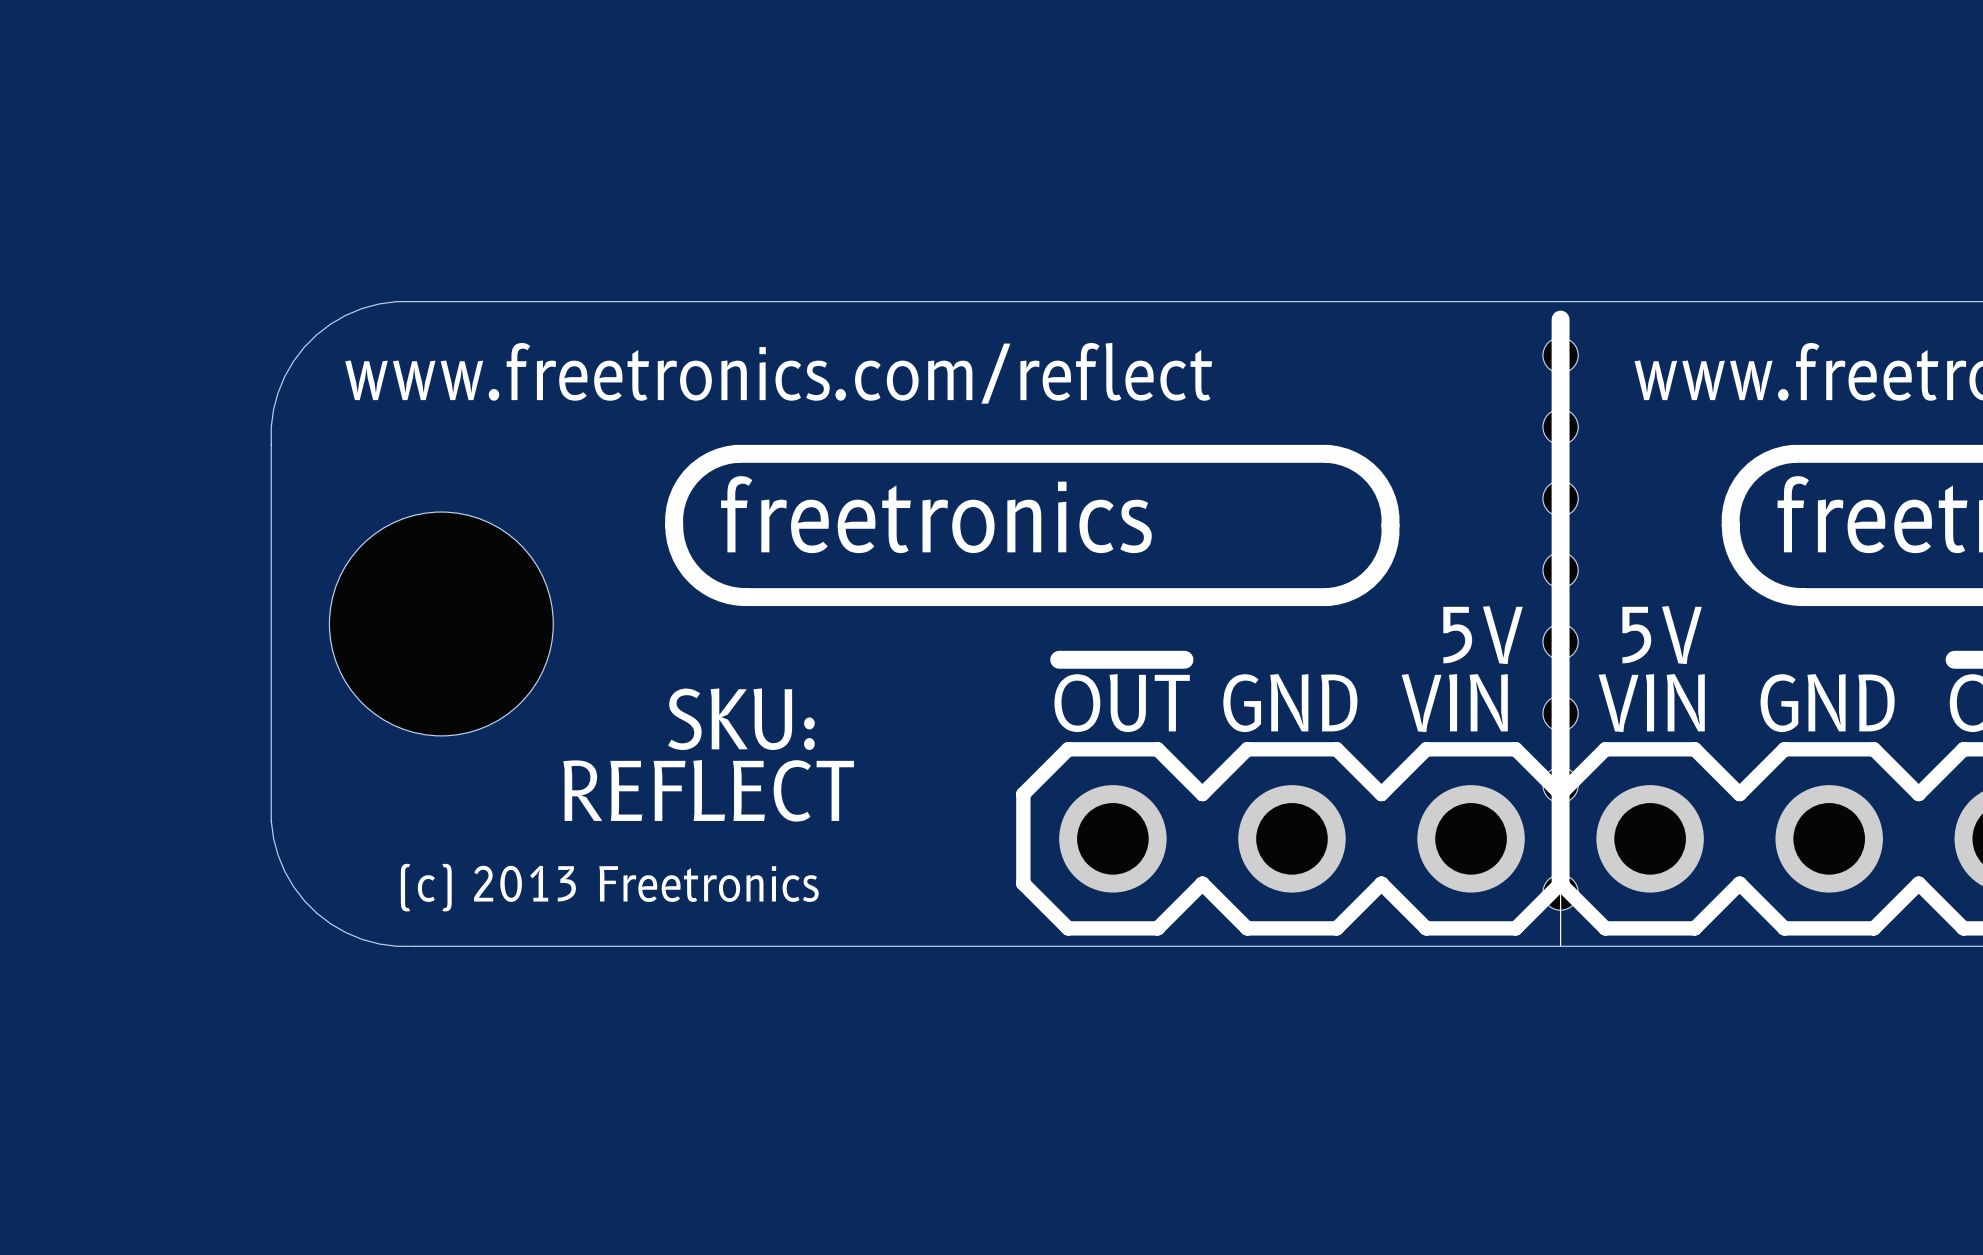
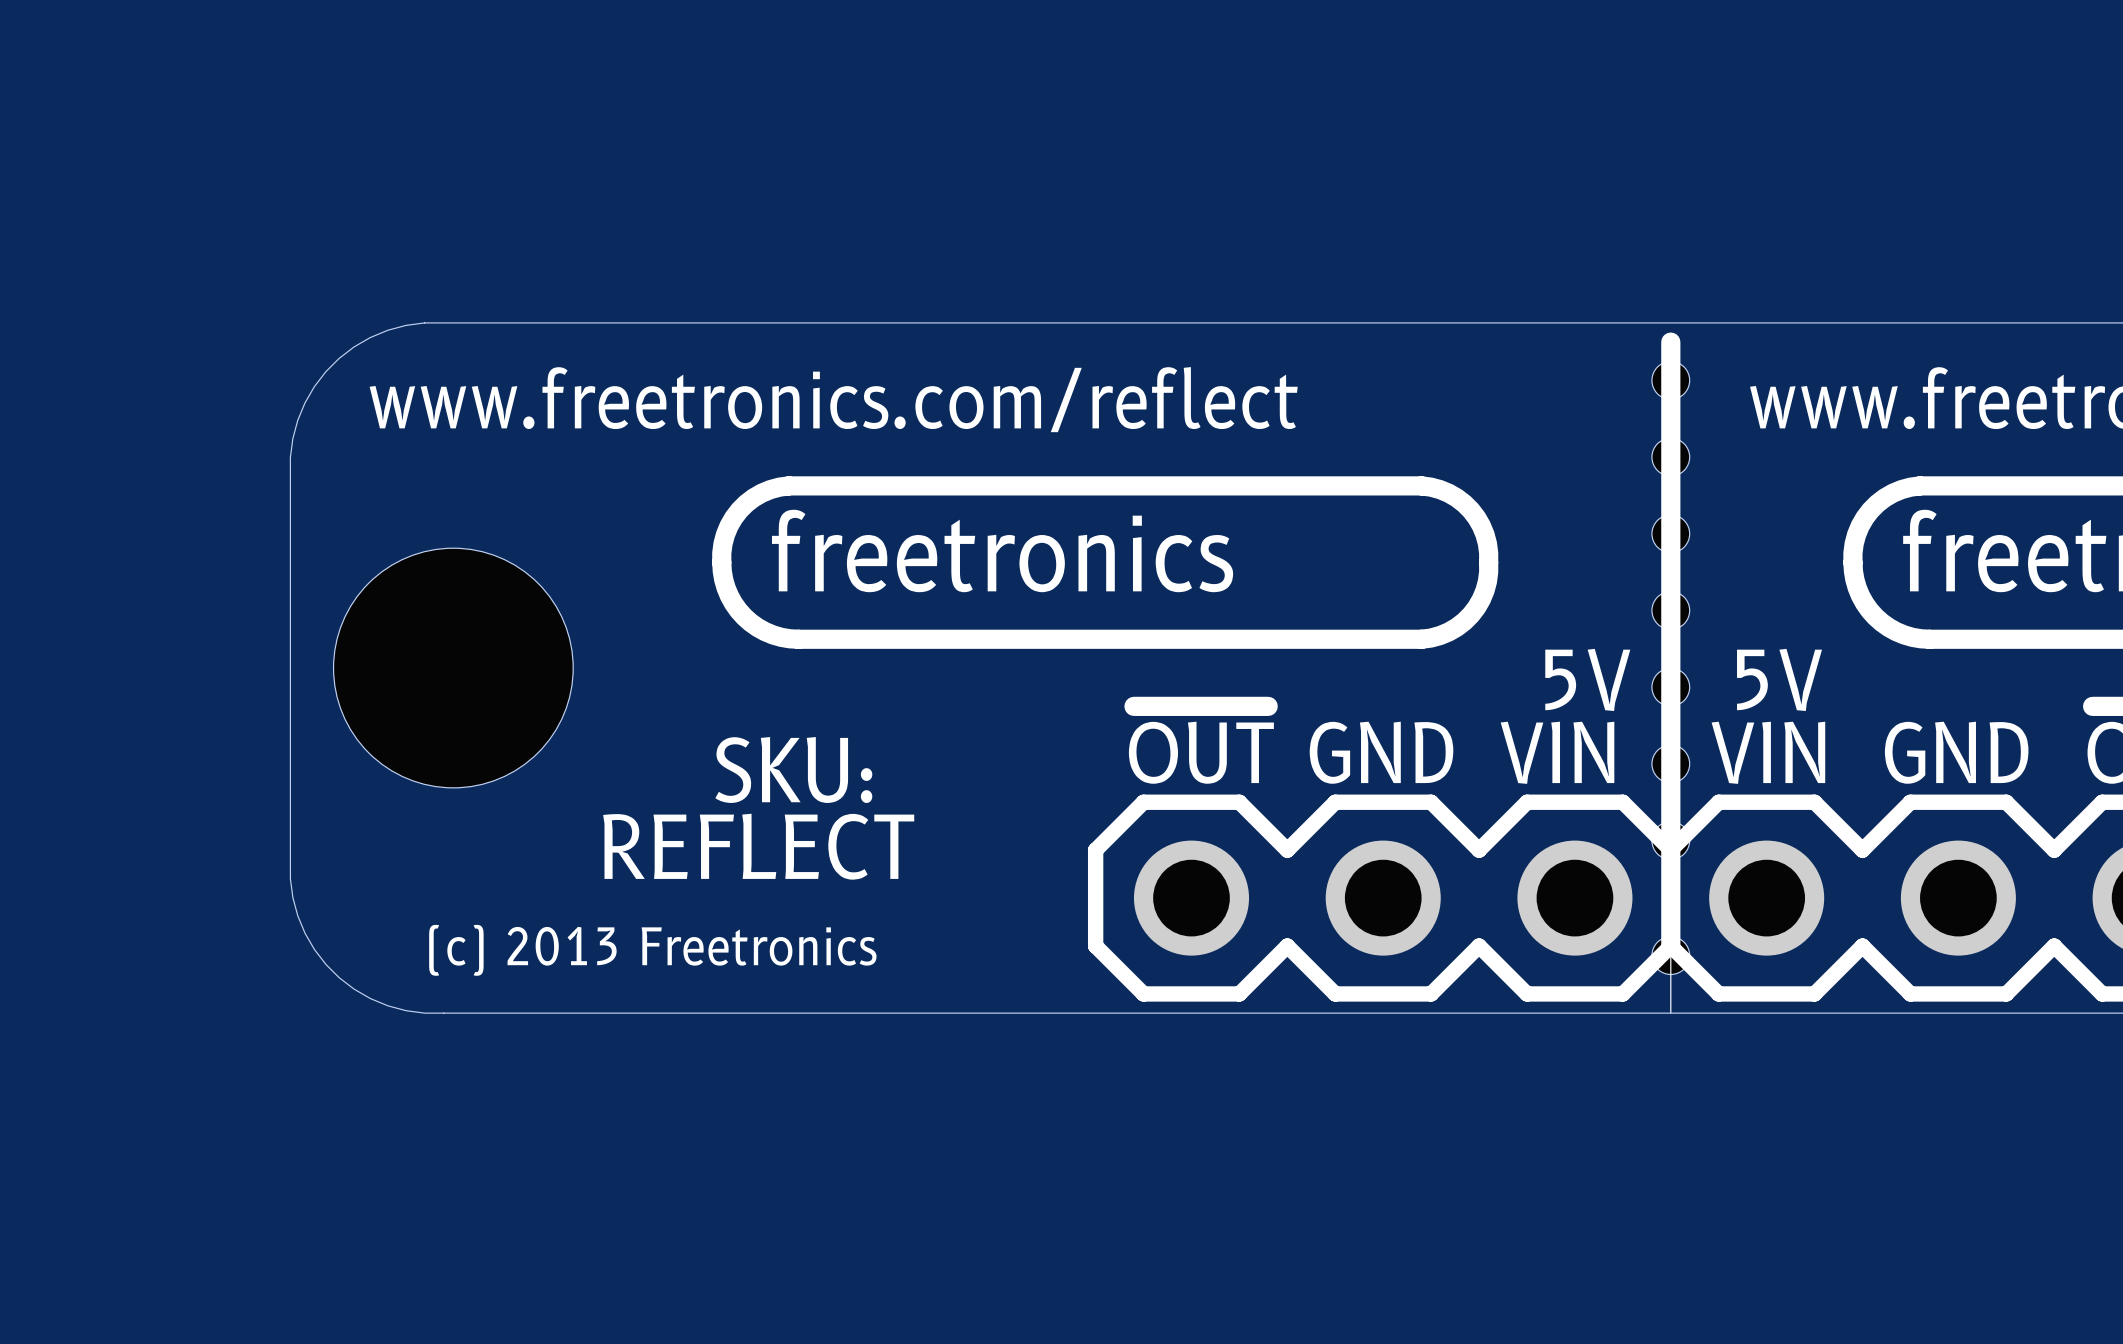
hole position: (441, 623) -> (453, 668)

